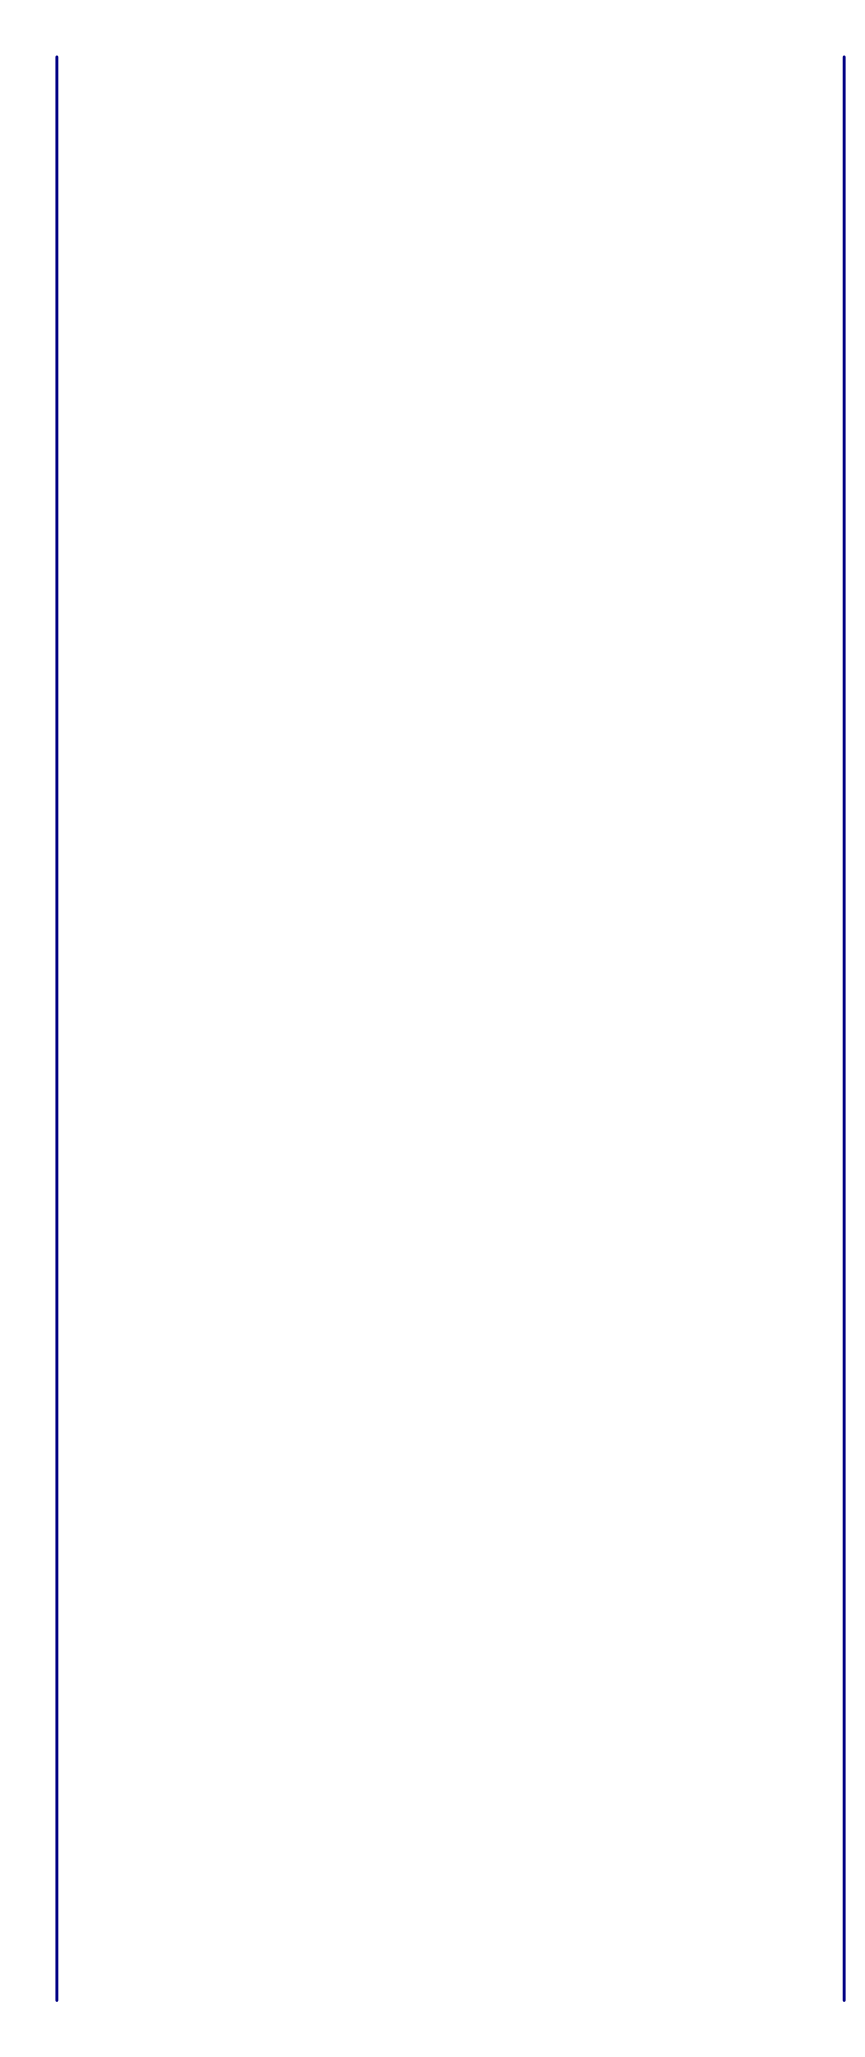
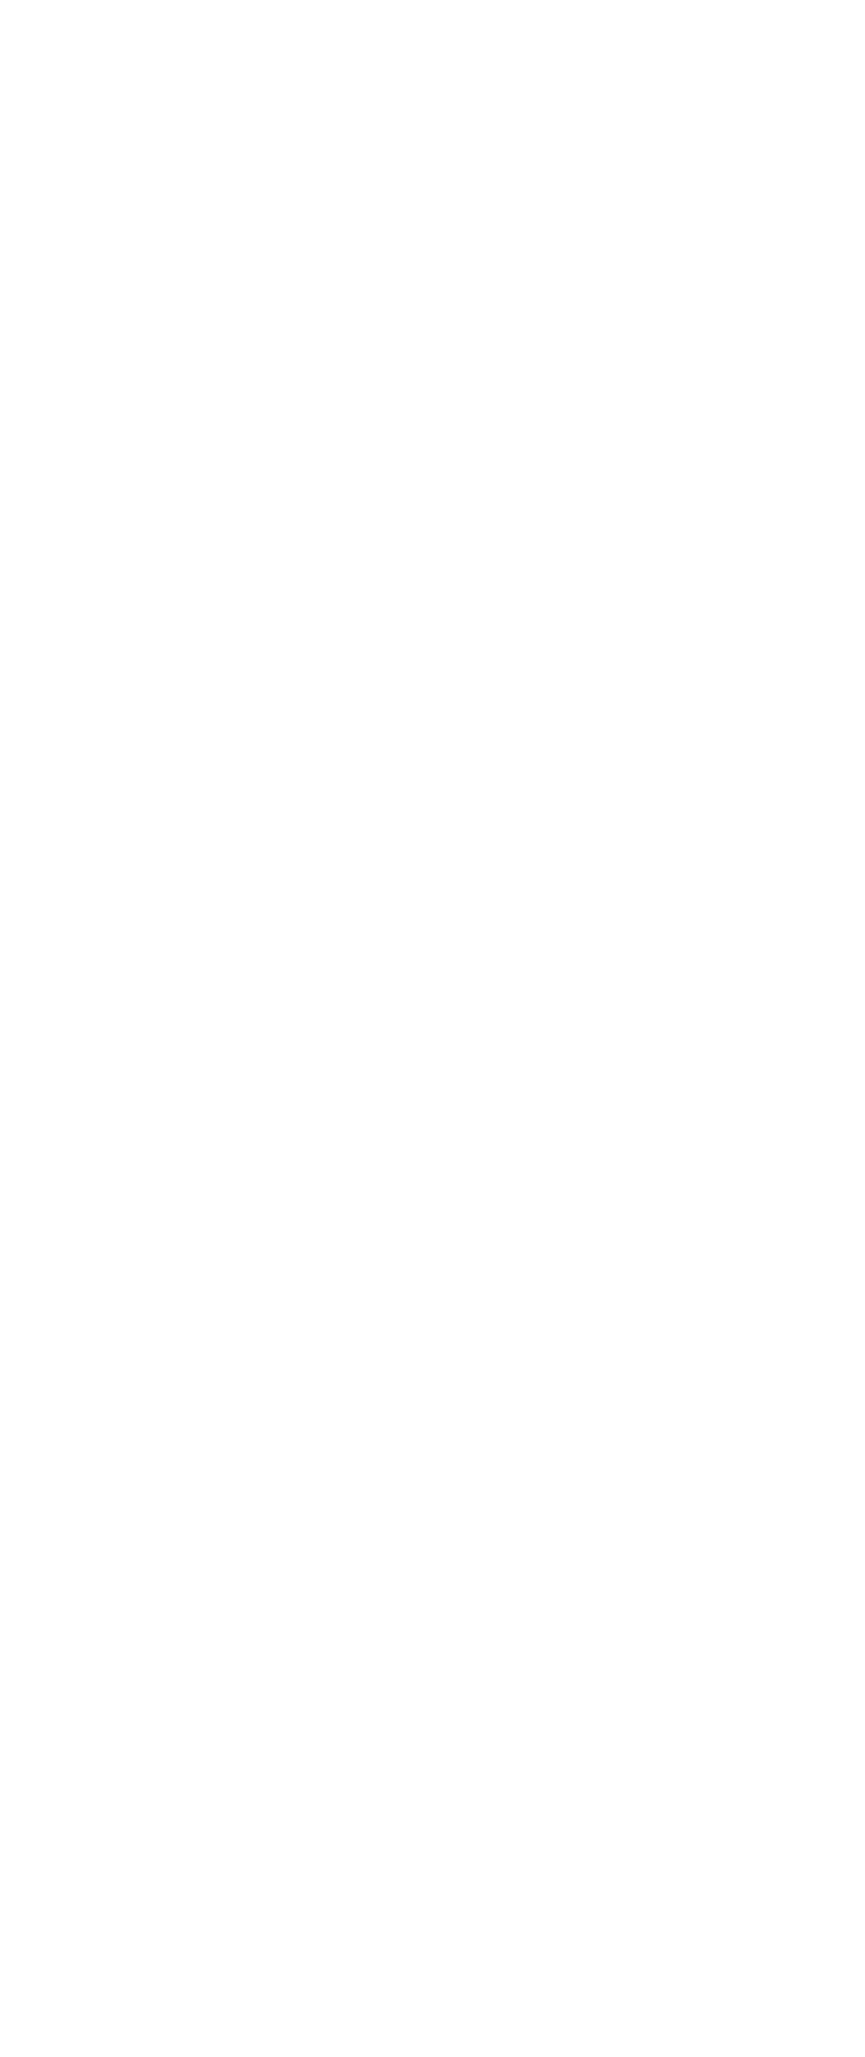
line: (56, 56) (56, 2000) -> none
line: (844, 56) (844, 2000) -> none

